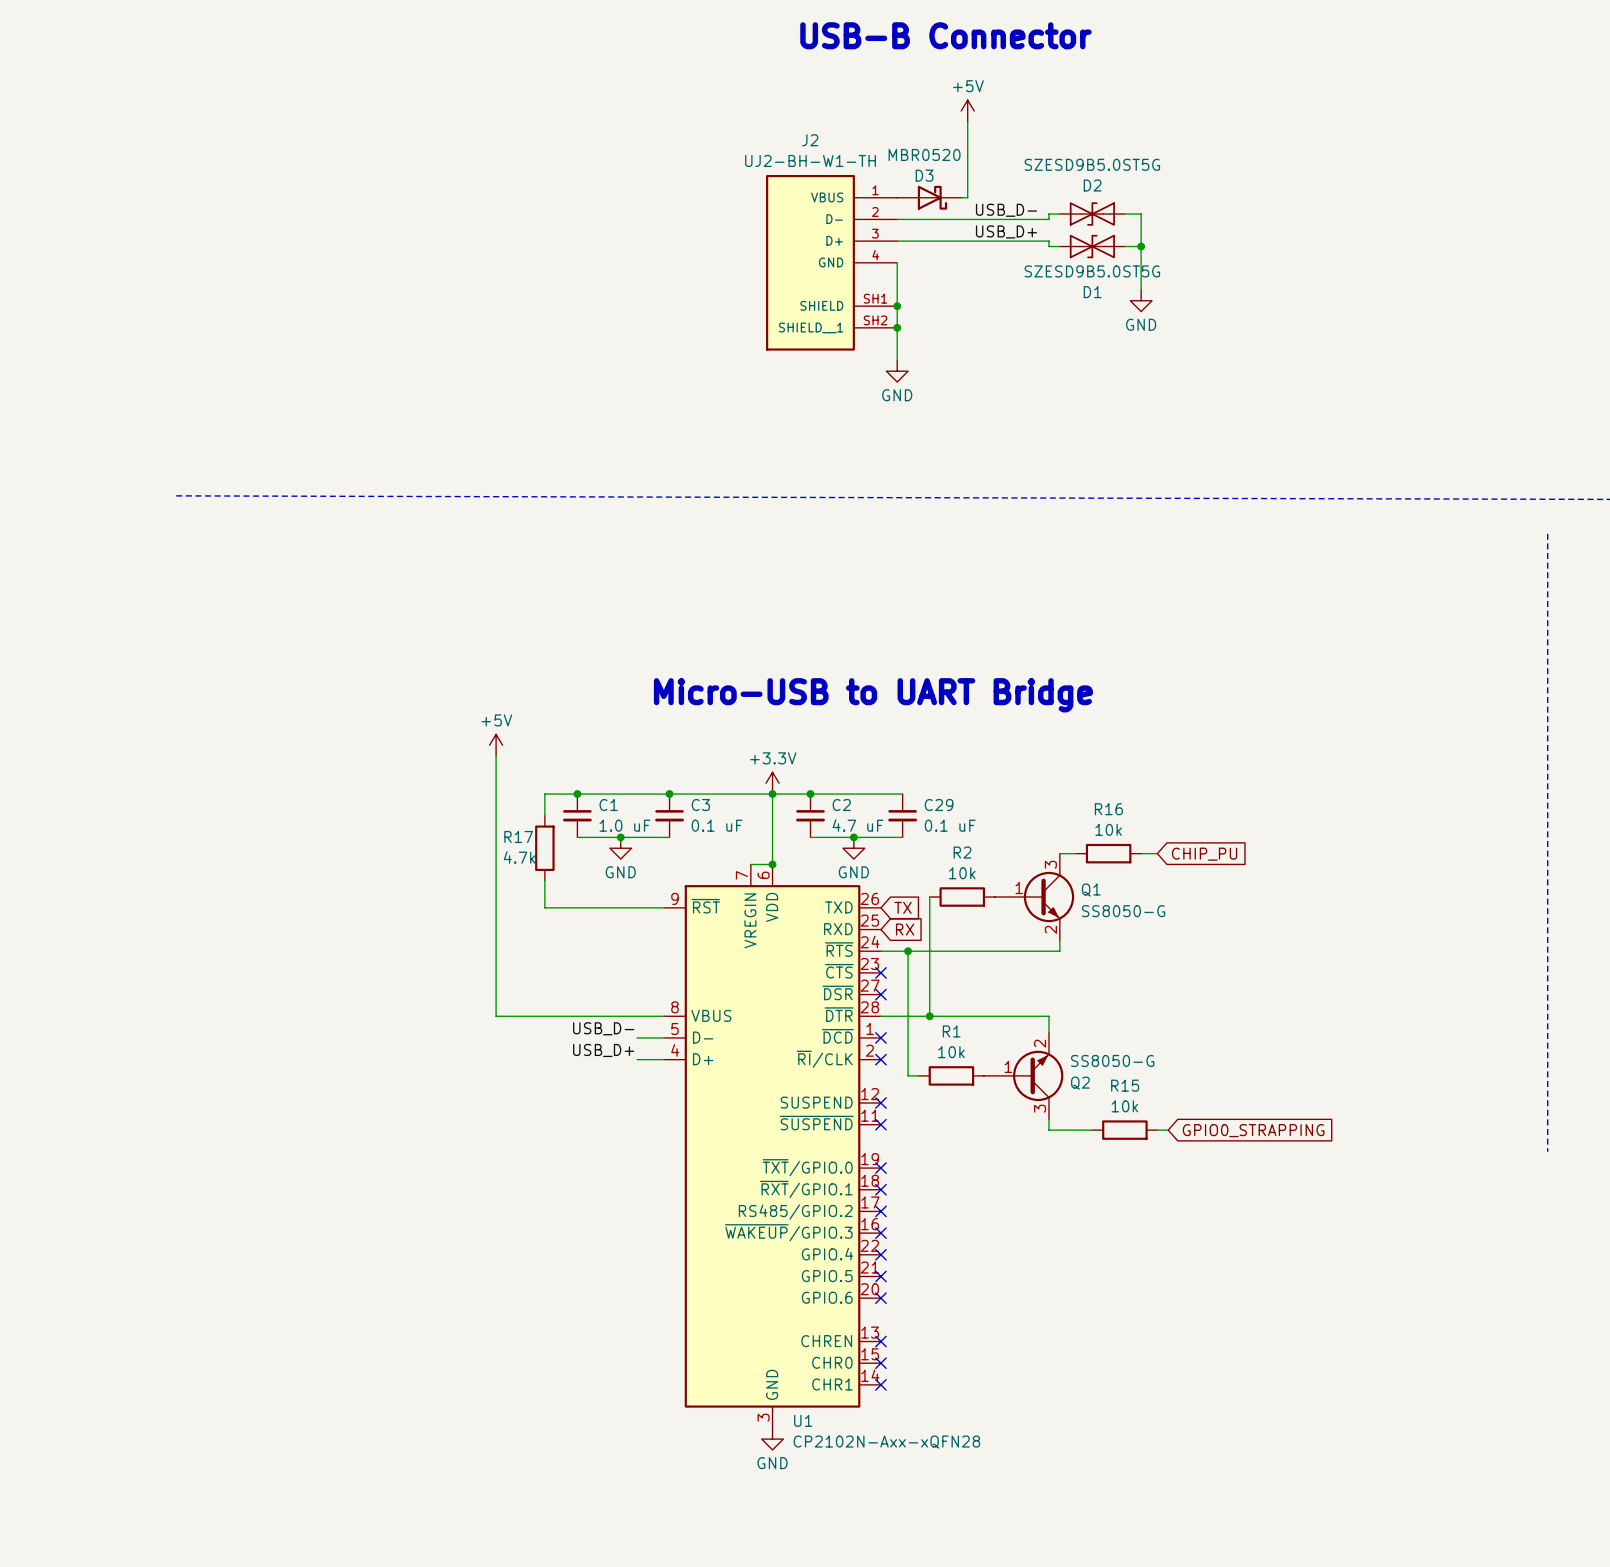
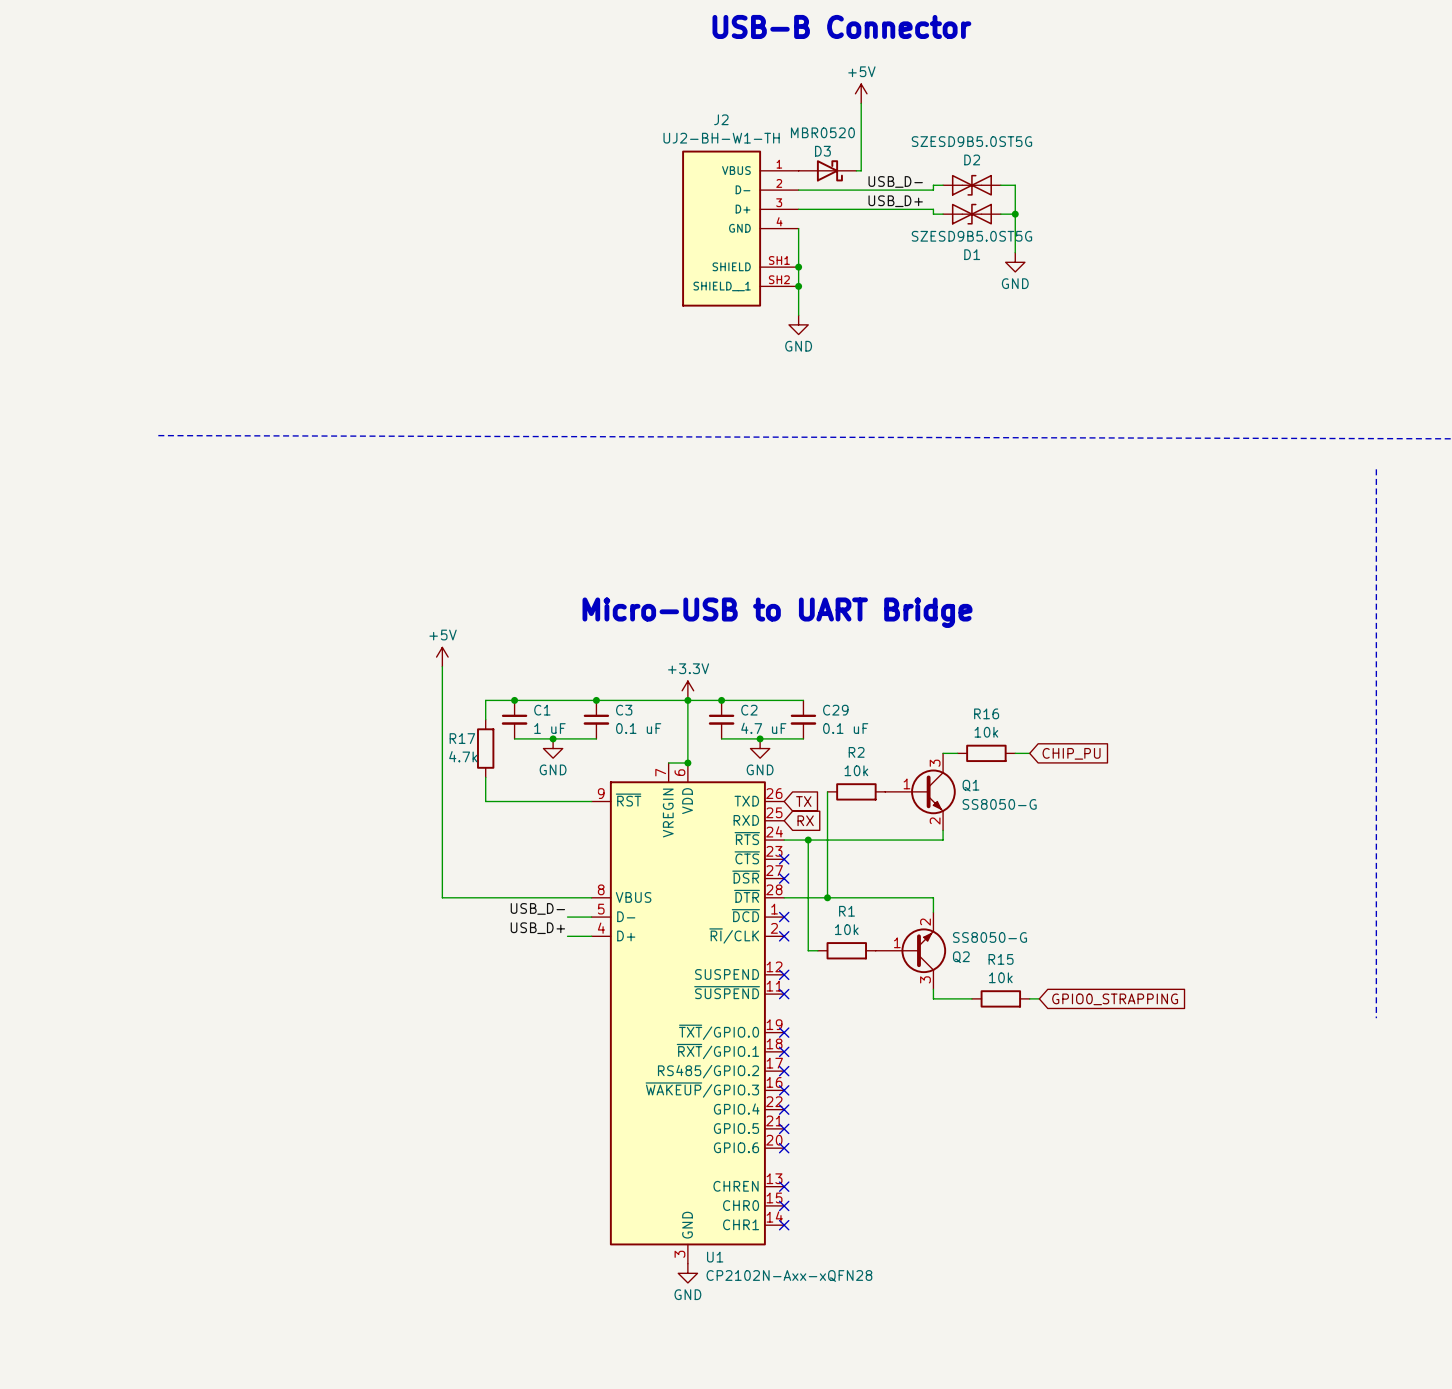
C1 value: 1.0 uF (624, 825) -> 1 uF (549, 728)

